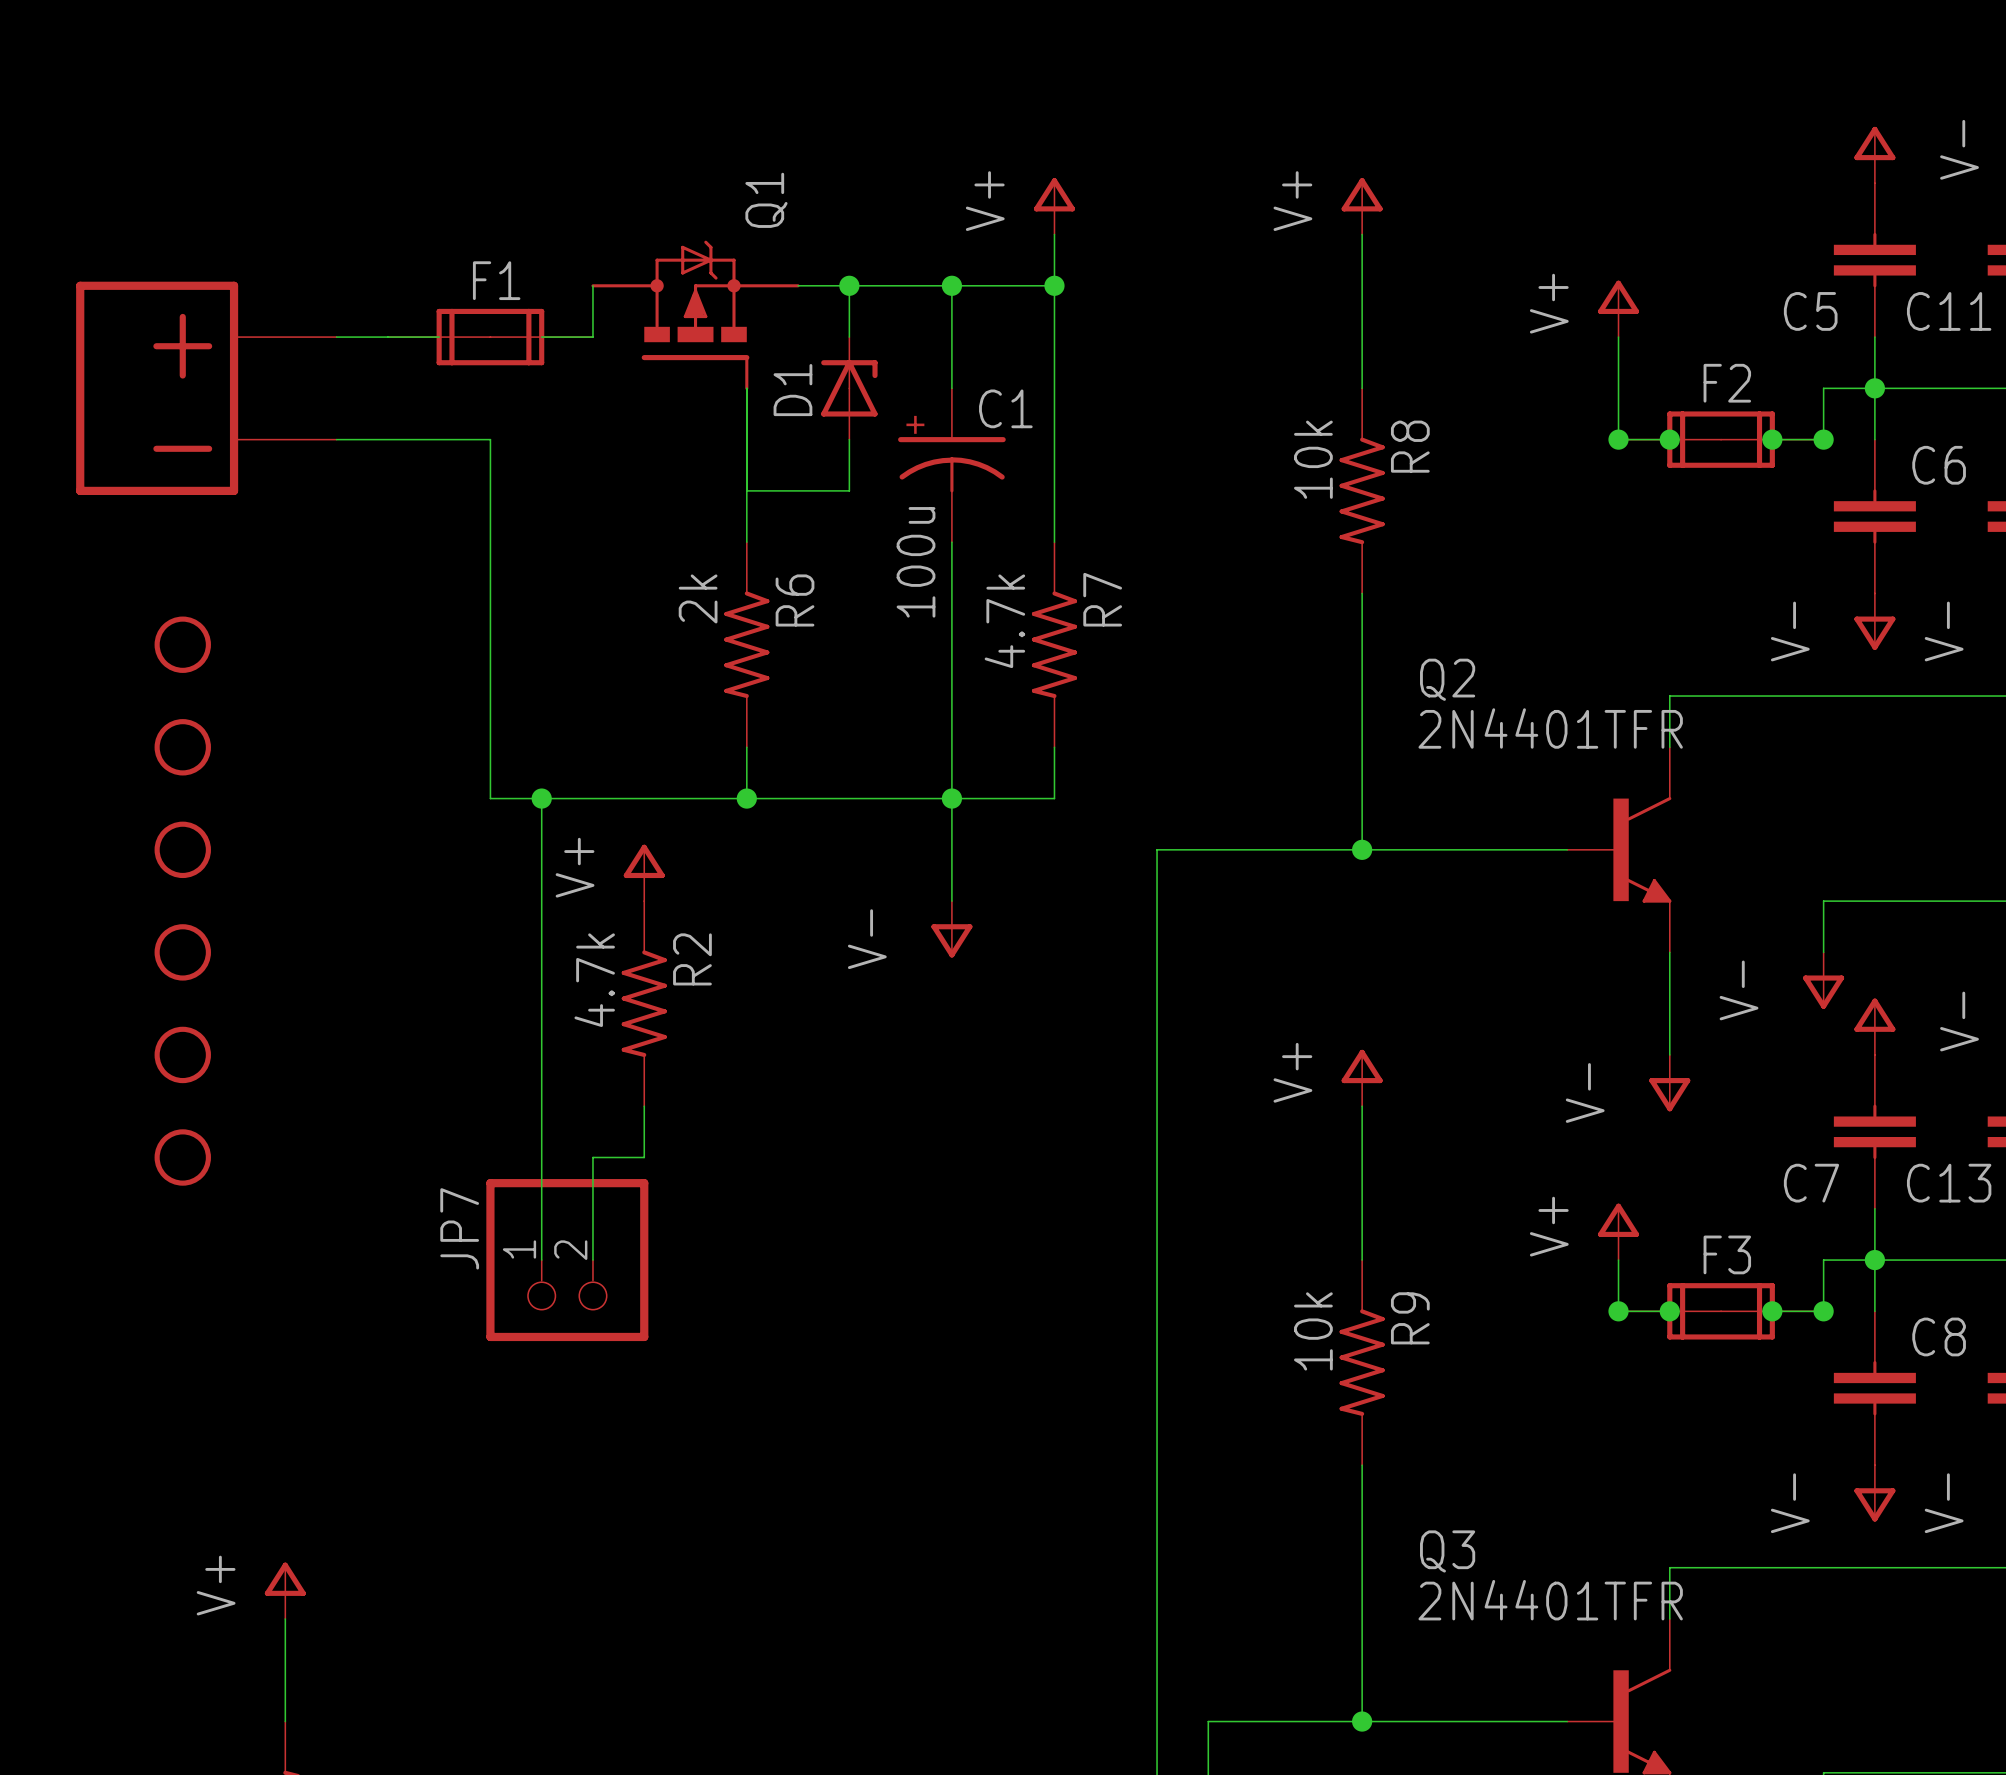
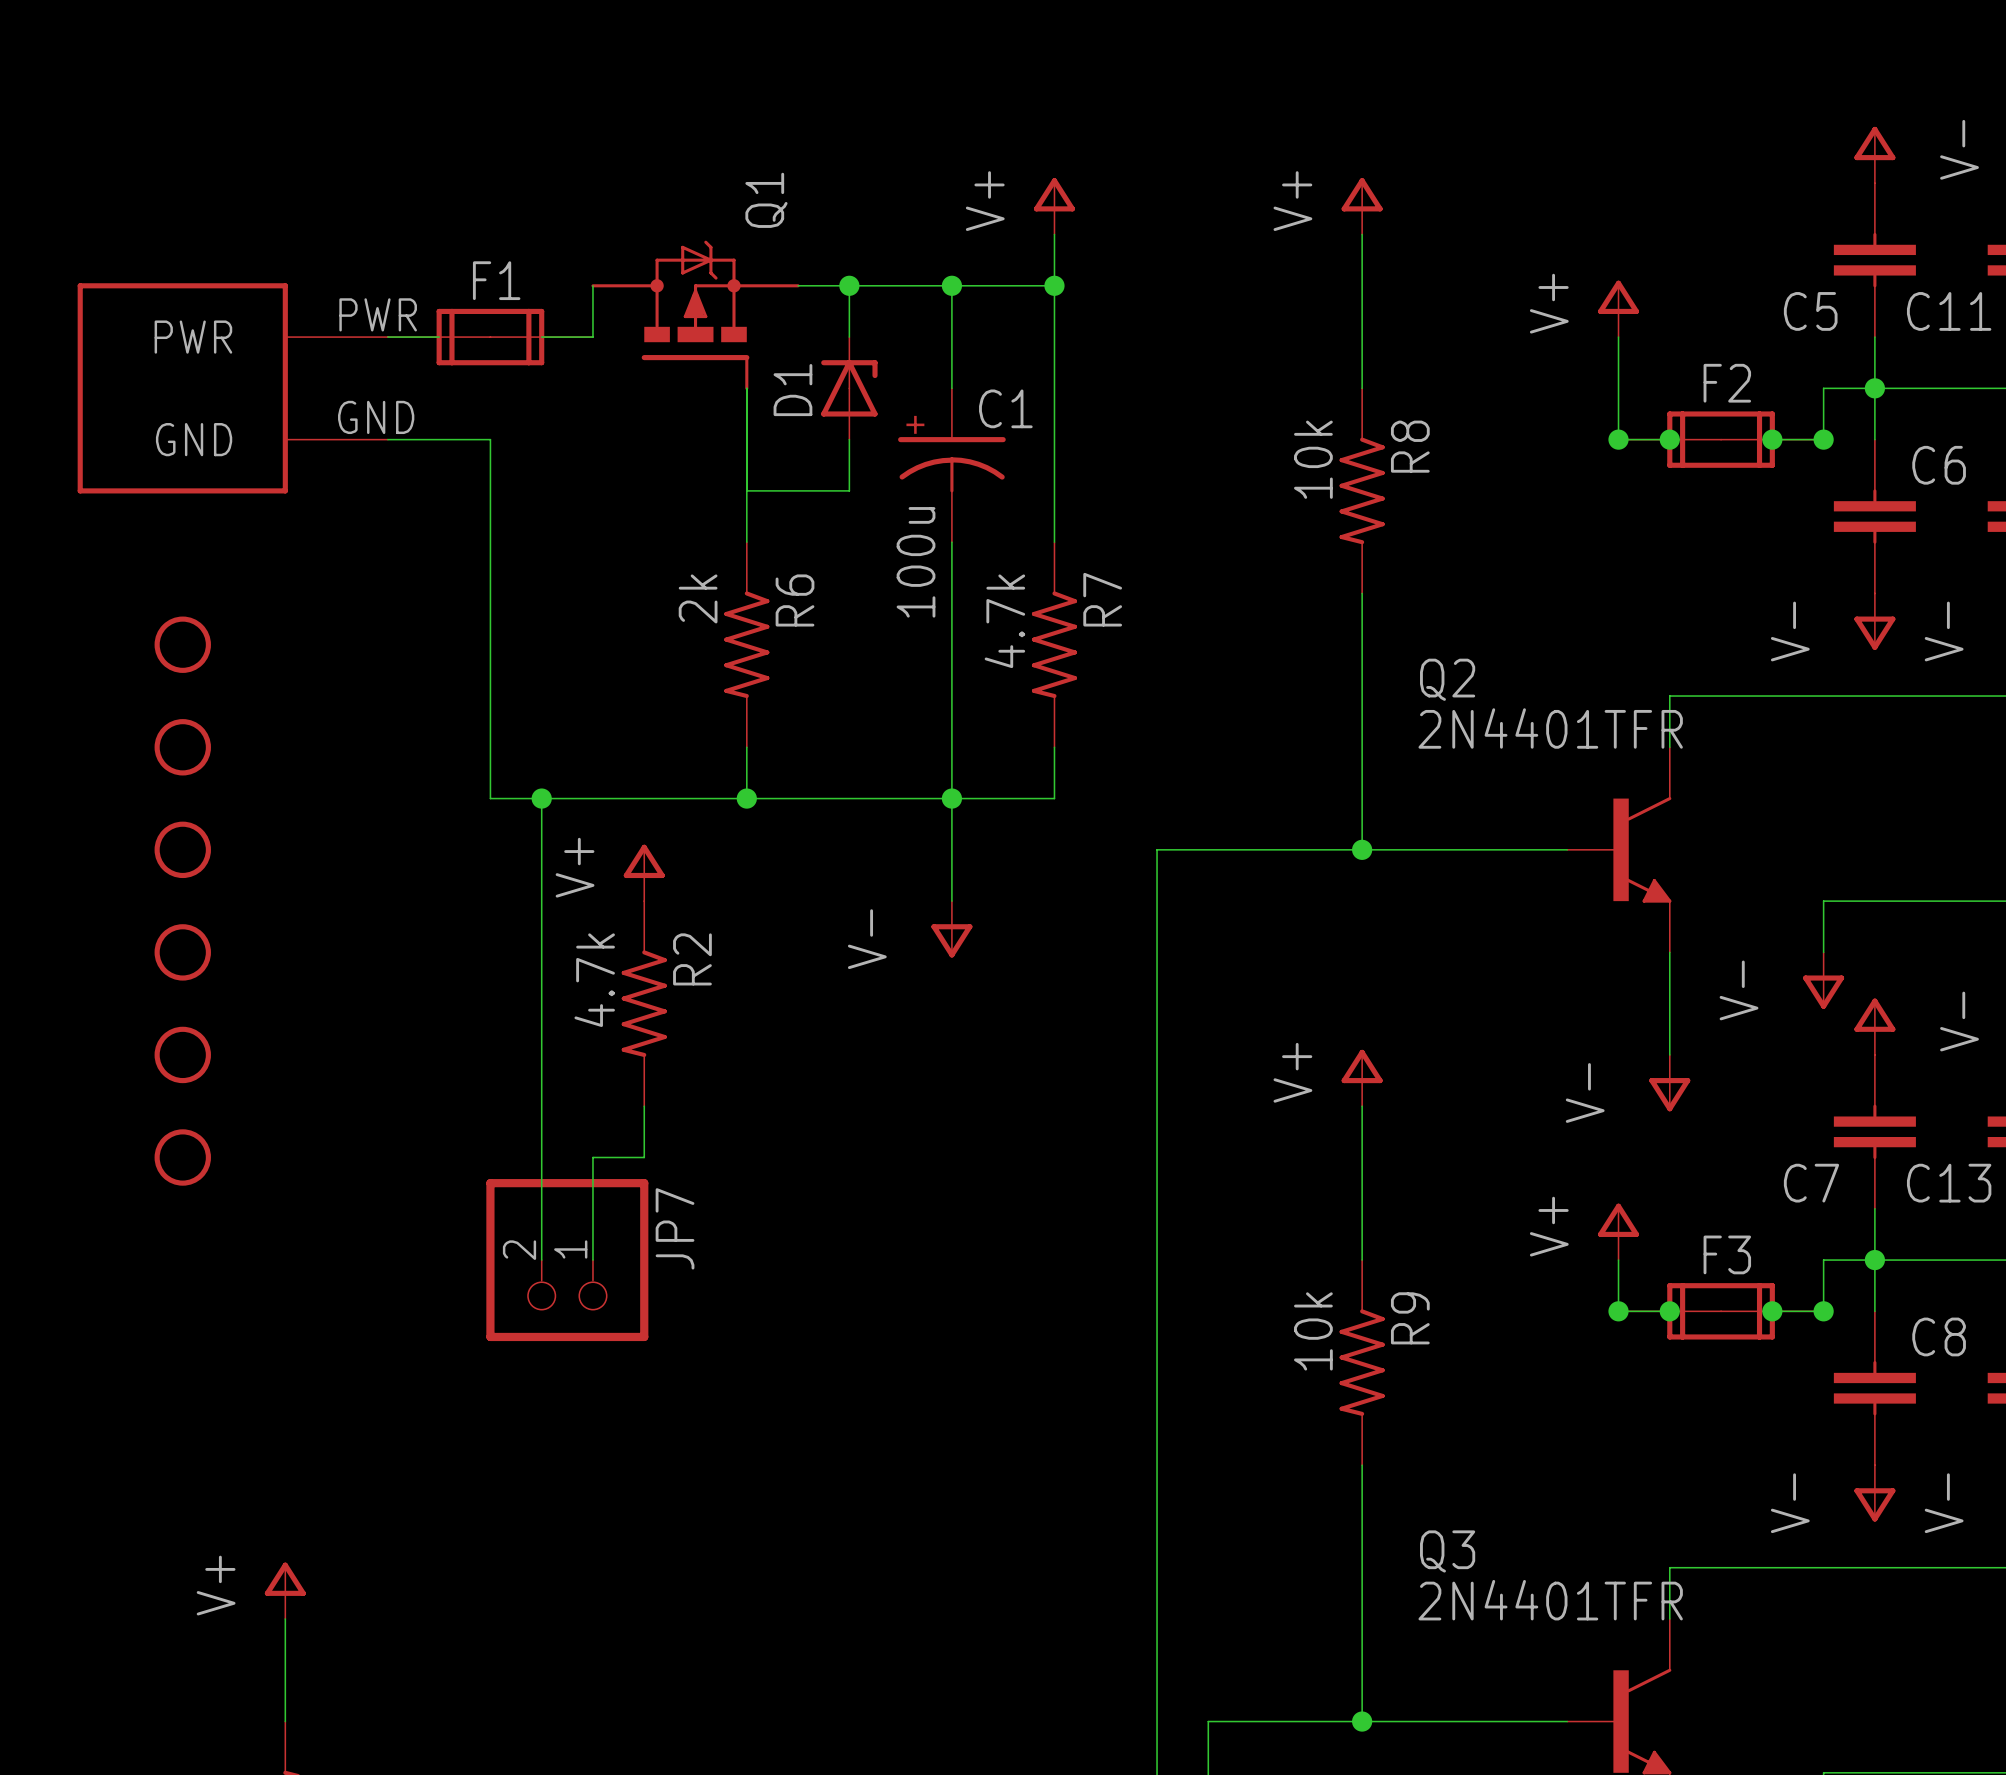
part: (206, 388) -> none
part: none -> (232, 388)
JP7 flip: as is (567, 1260) -> left-right (567, 1260)

